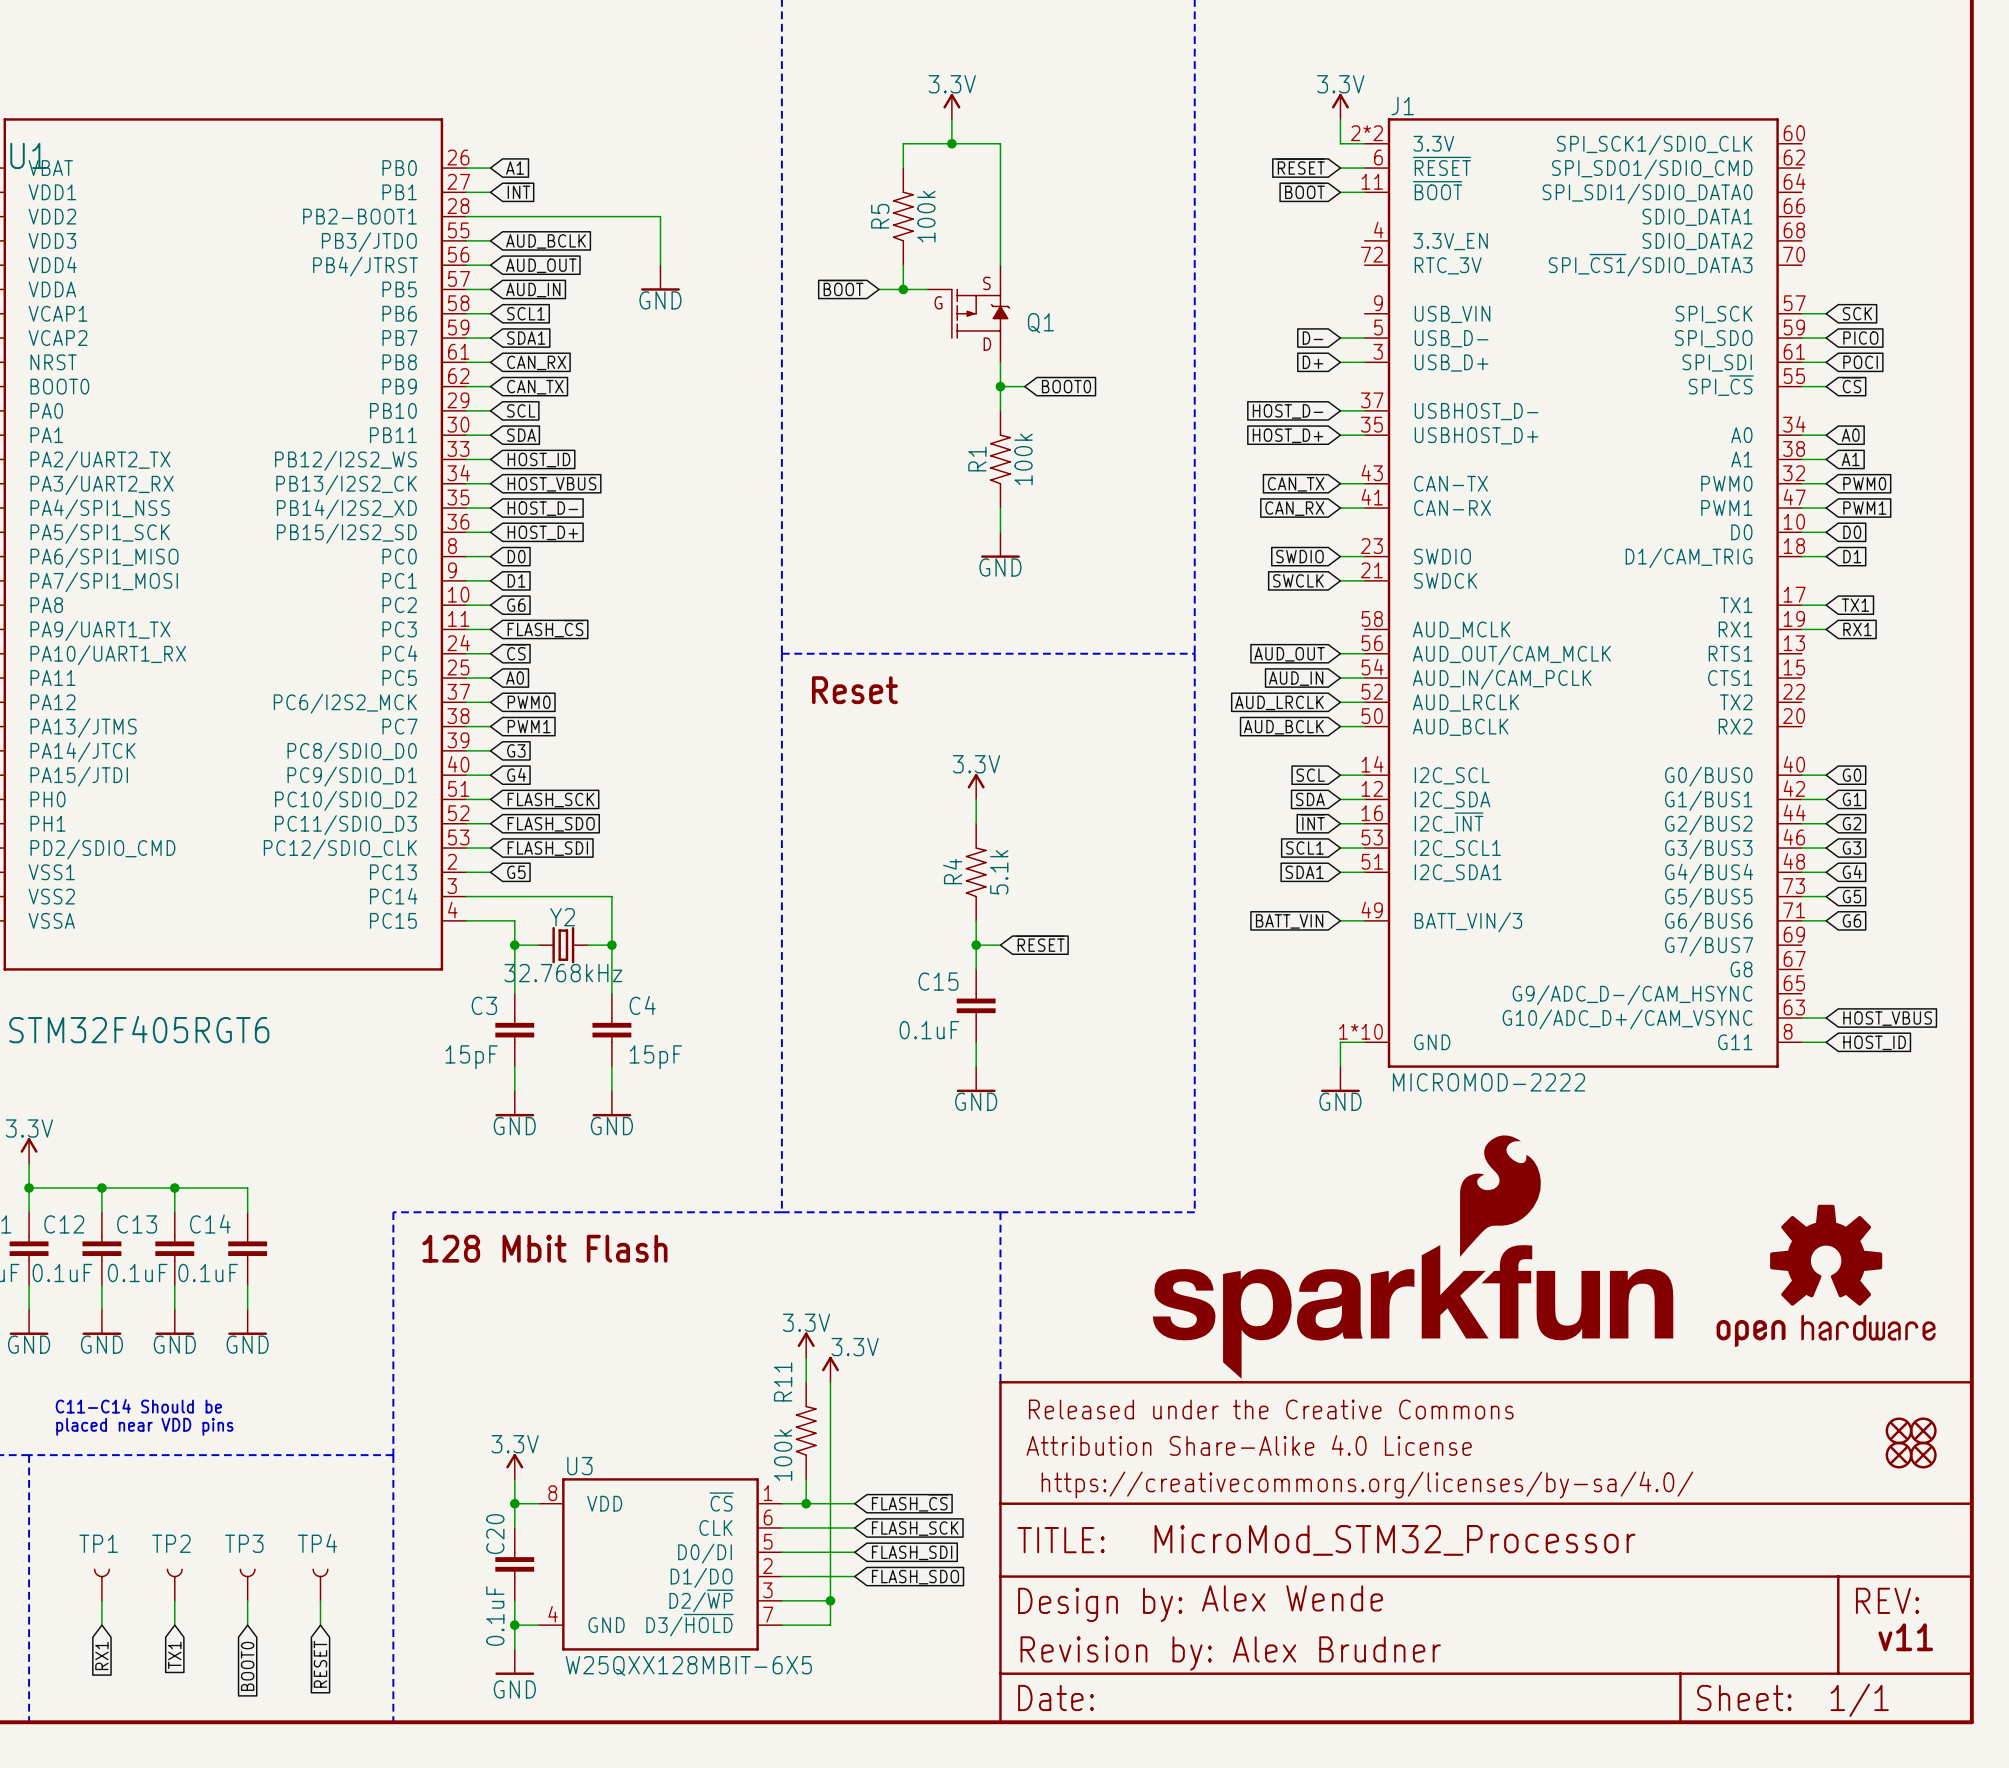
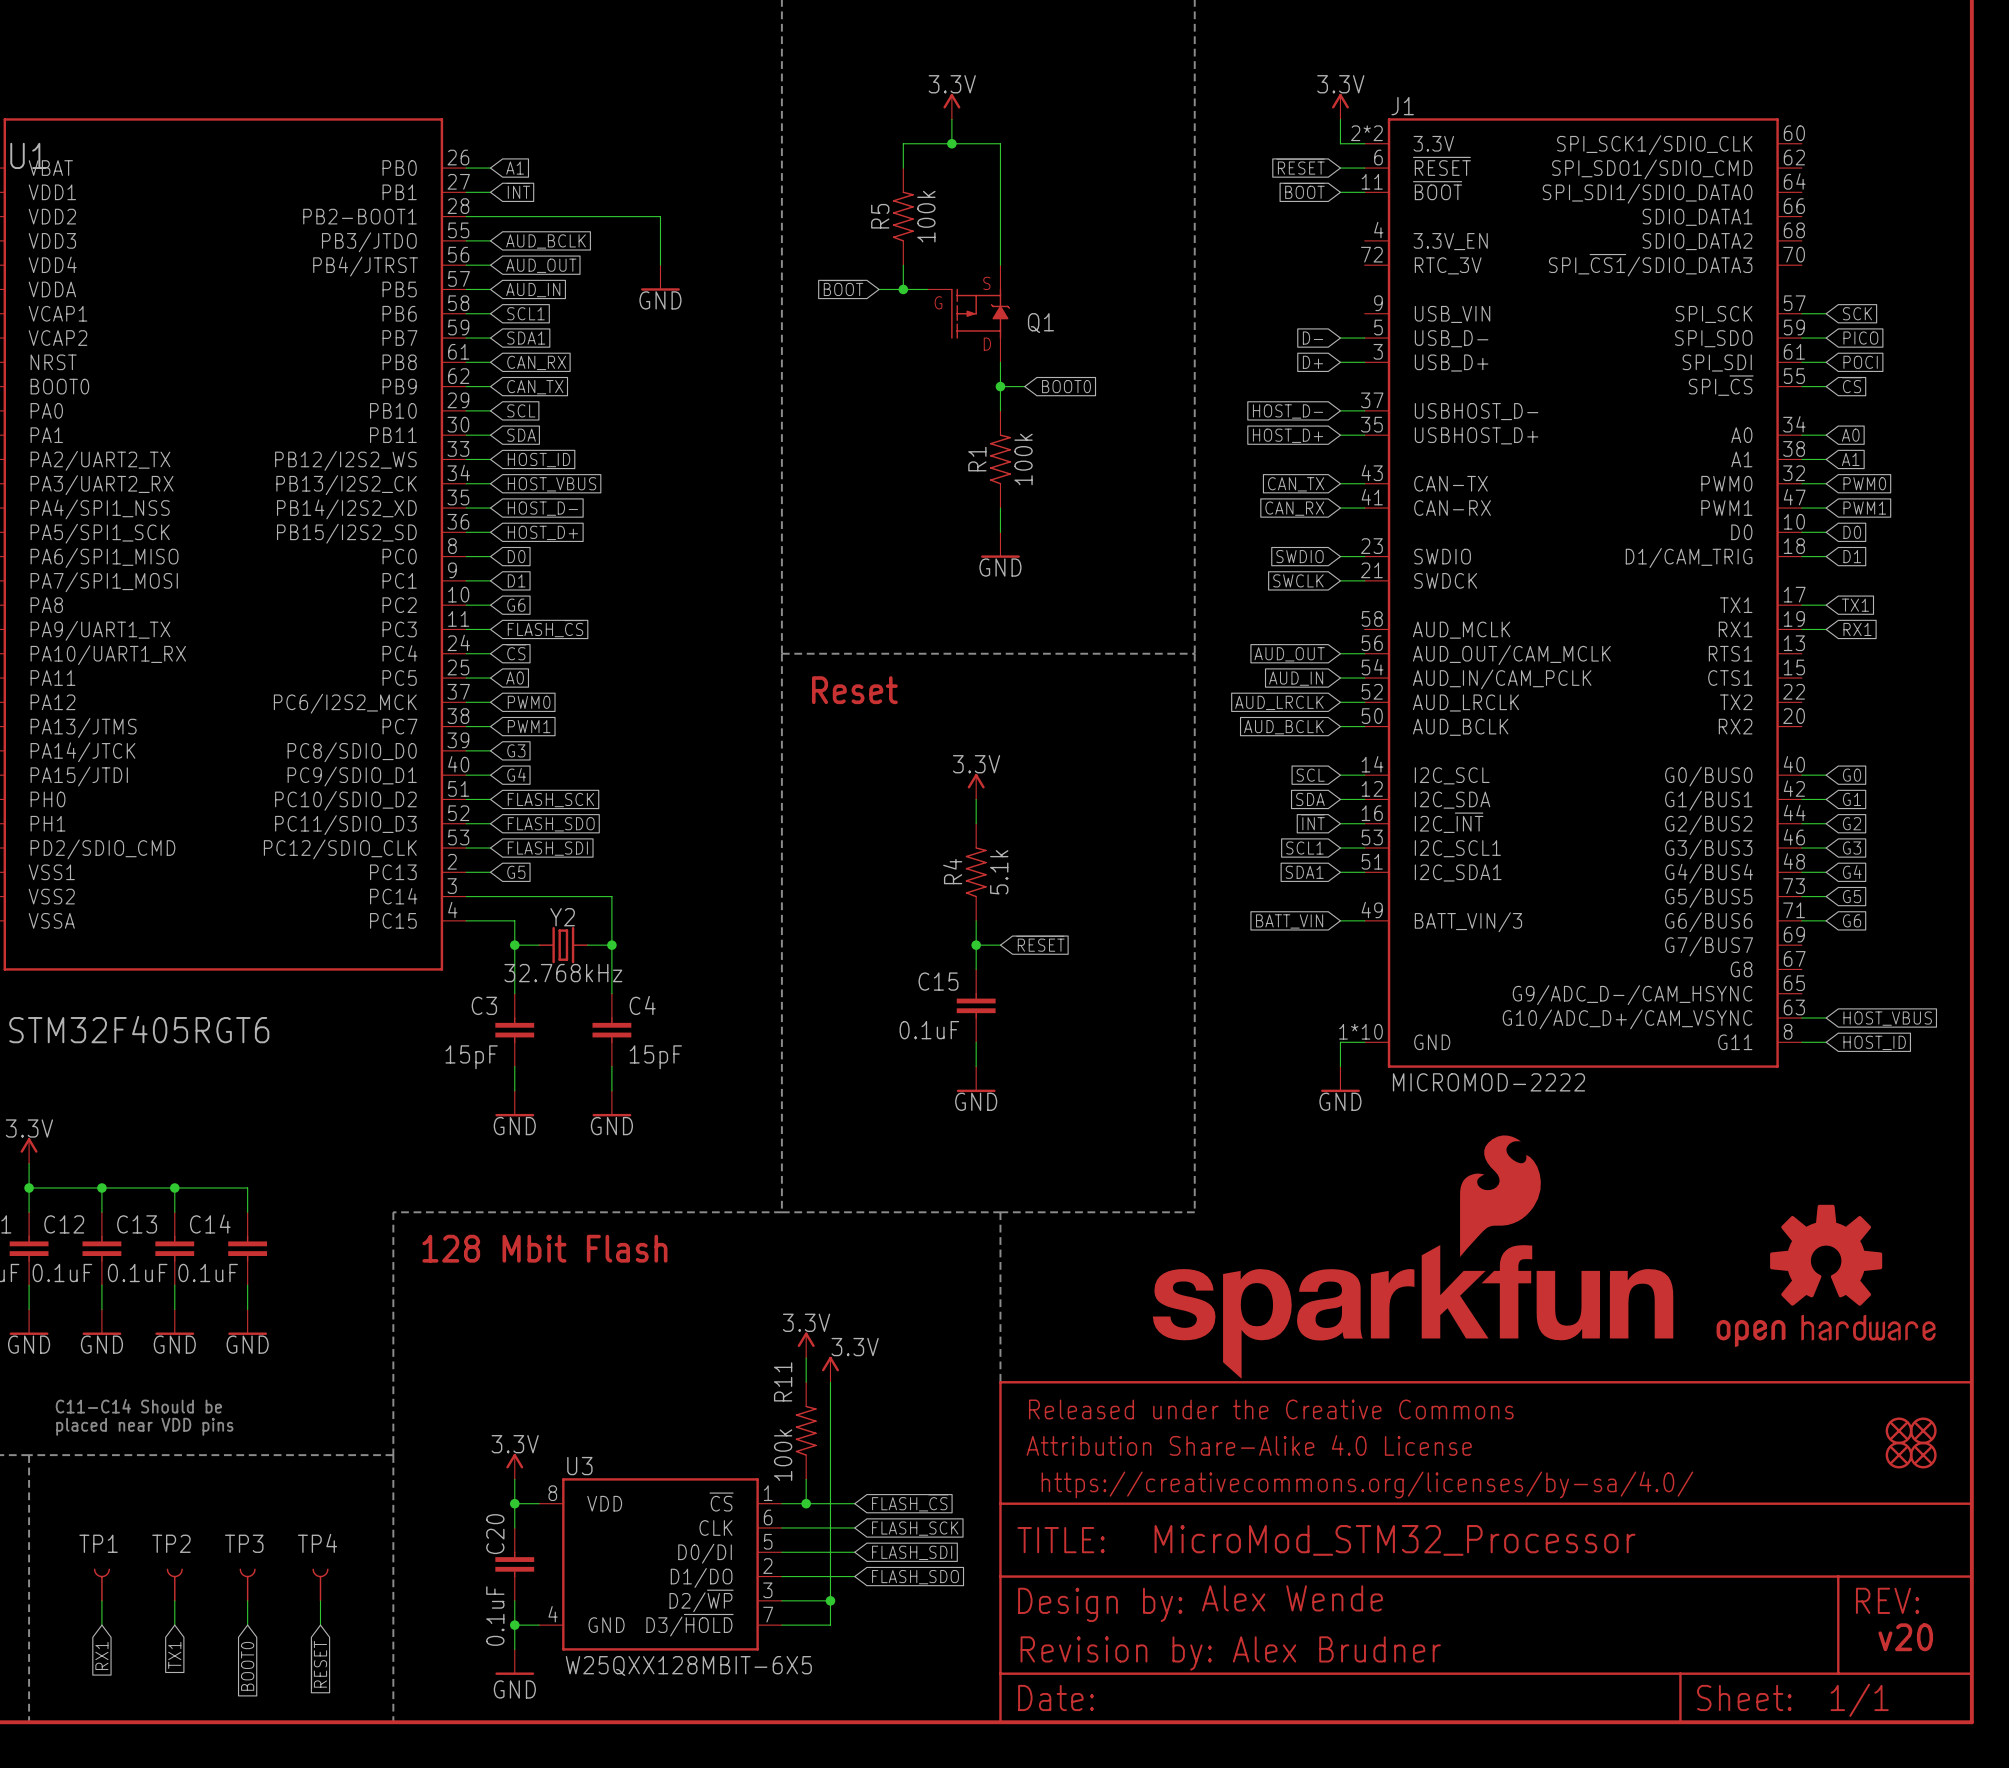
text: v11 (1905, 1637) -> v20 (1905, 1637)

